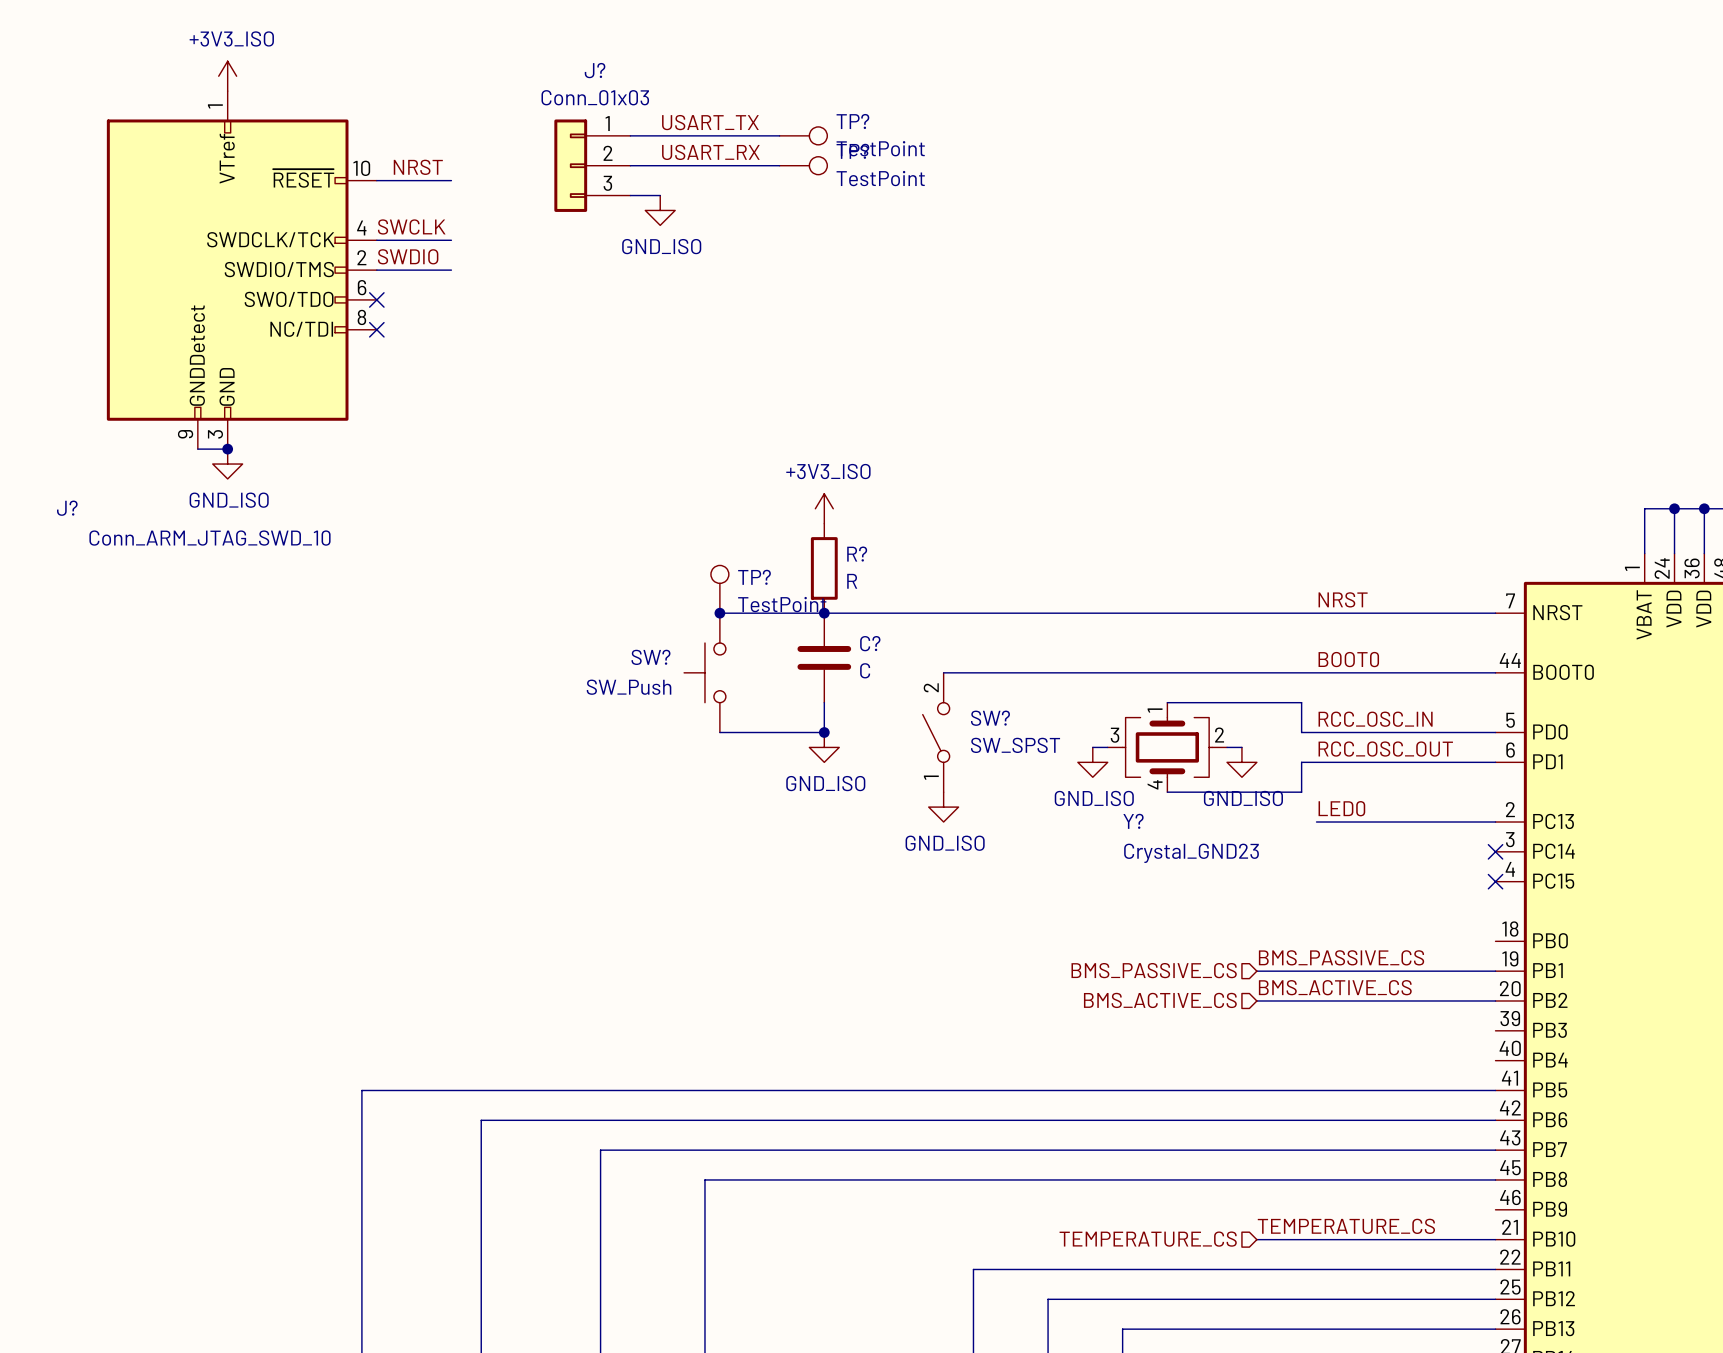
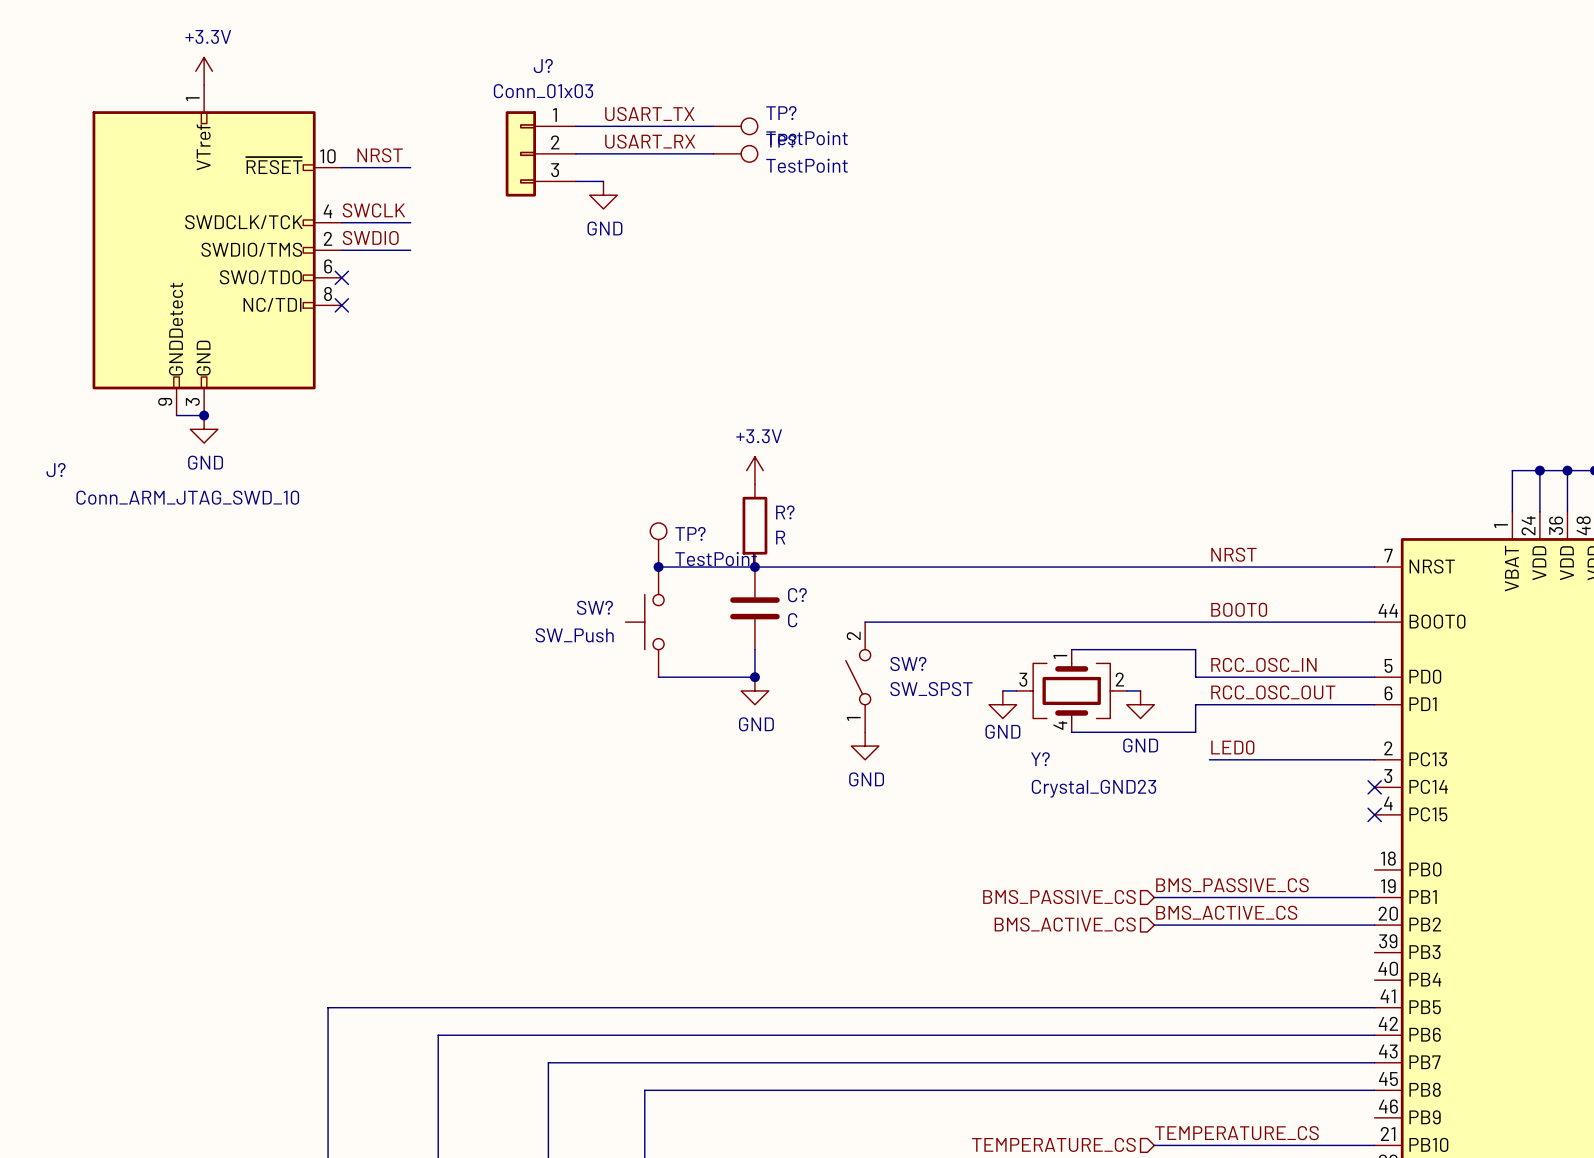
power symbol: +3V3_ISO (227, 76) -> +3.3V (204, 71)
power symbol: GND_ISO (660, 210) -> GND (603, 195)
power symbol: GND_ISO (227, 464) -> GND (204, 429)
power symbol: +3V3_ISO (824, 508) -> +3.3V (754, 470)
power symbol: GND_ISO (824, 747) -> GND (754, 690)
power symbol: GND_ISO (1092, 762) -> GND (1002, 704)
power symbol: GND_ISO (1241, 762) -> GND (1140, 704)
power symbol: GND_ISO (943, 807) -> GND (865, 746)

